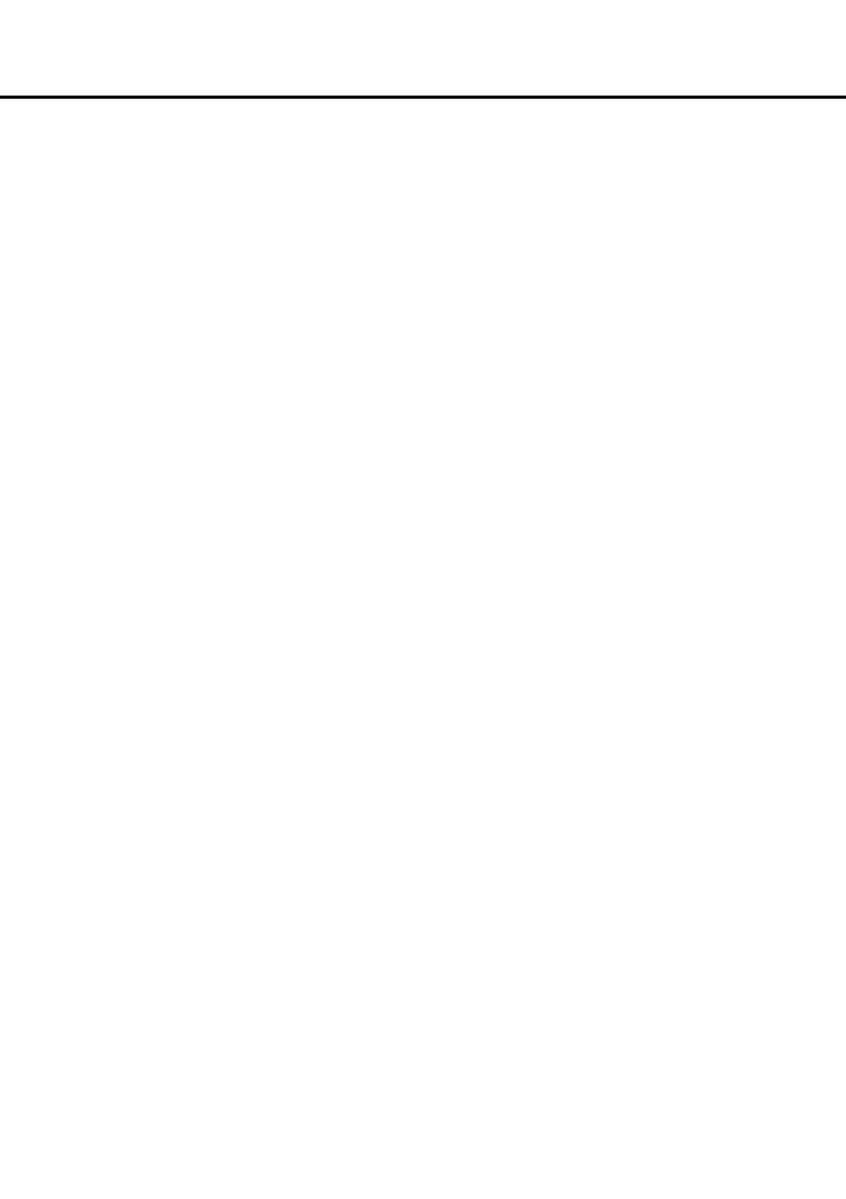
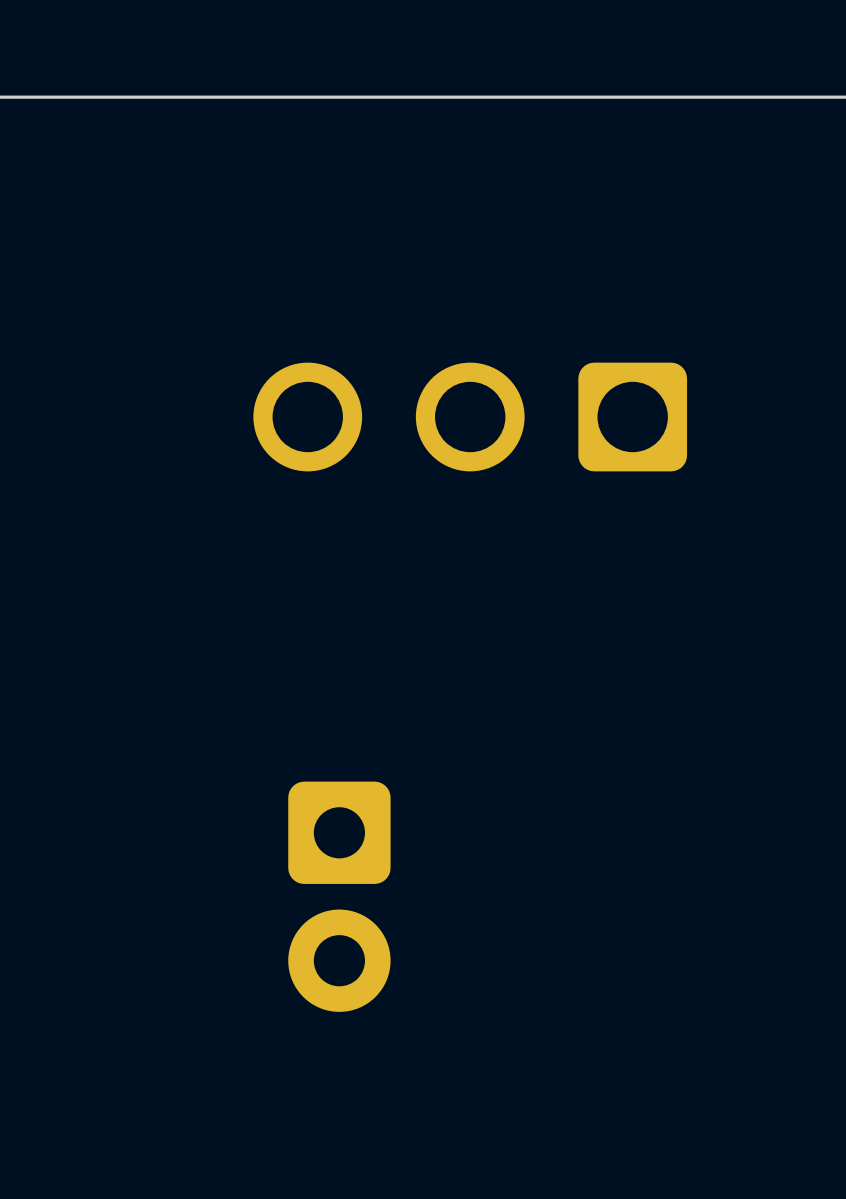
part: none -> (470, 417)
part: none -> (339, 896)

